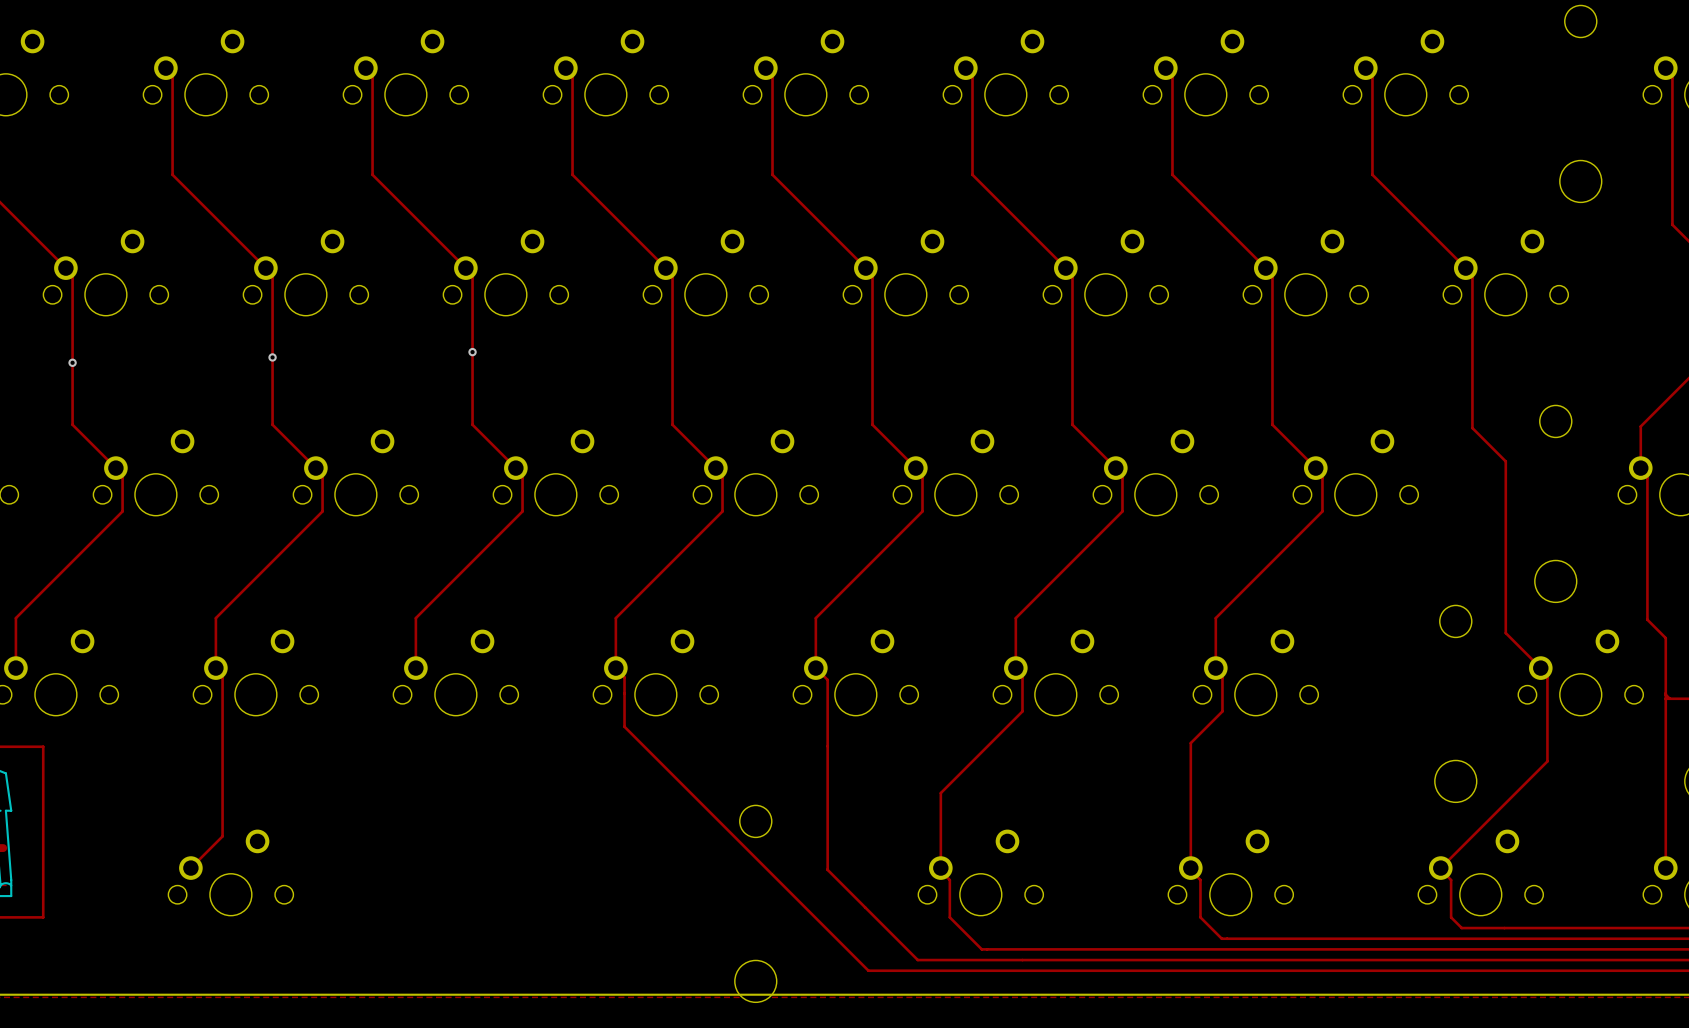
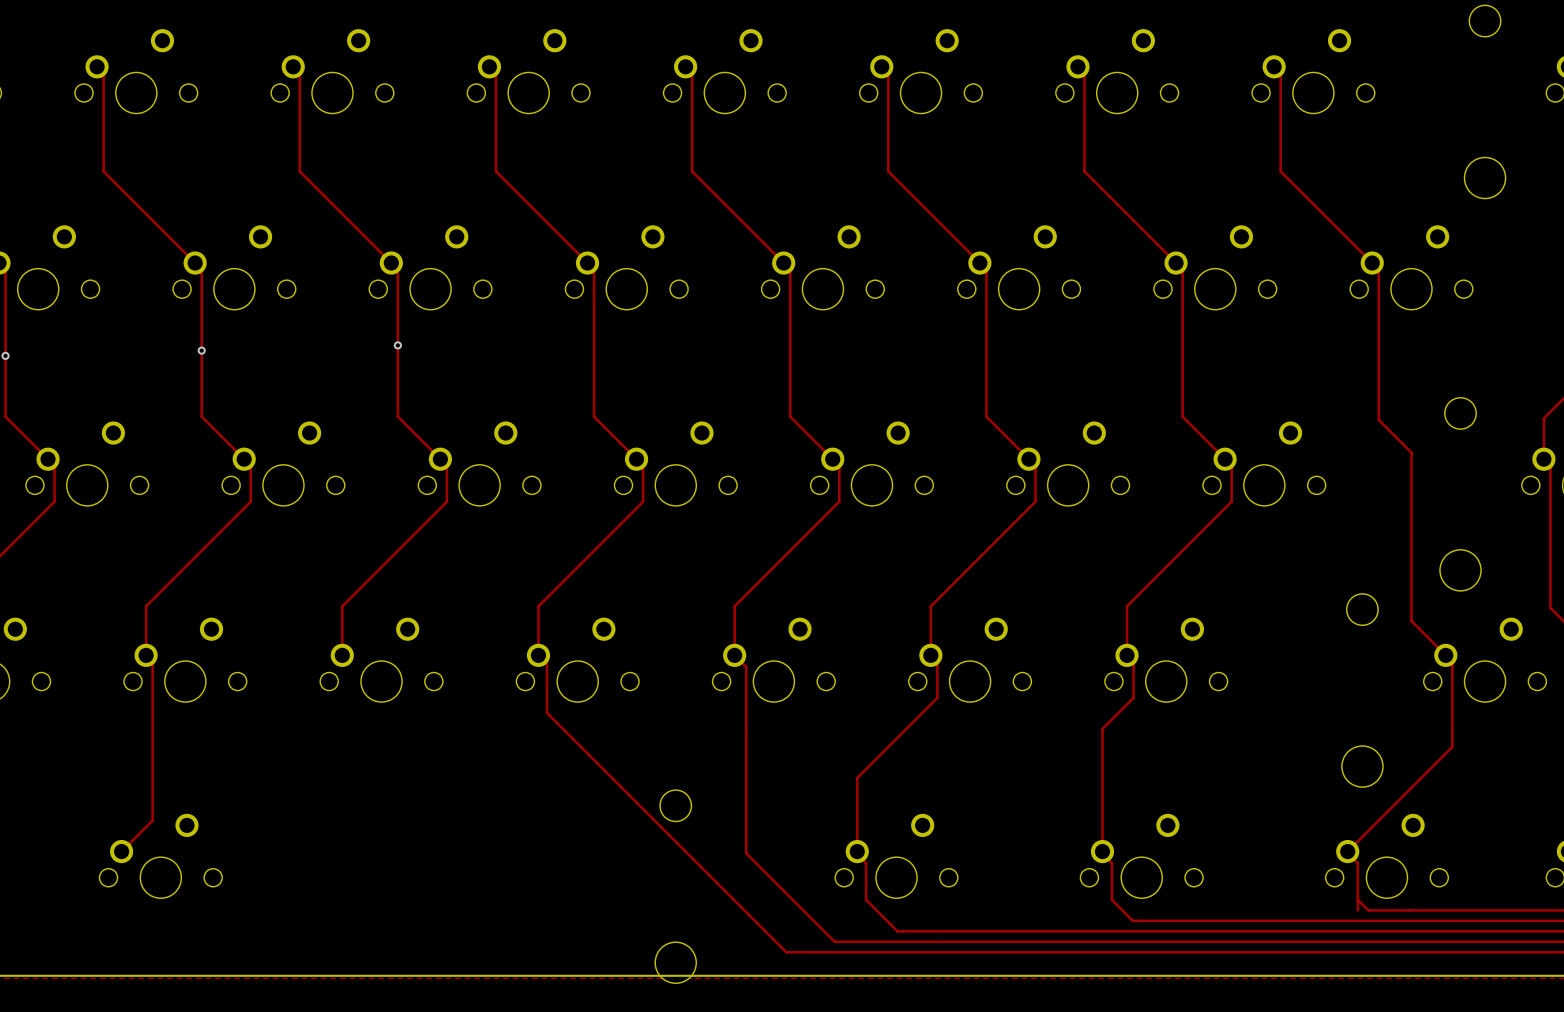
track: none -> (1357, 899) (1357, 910)

